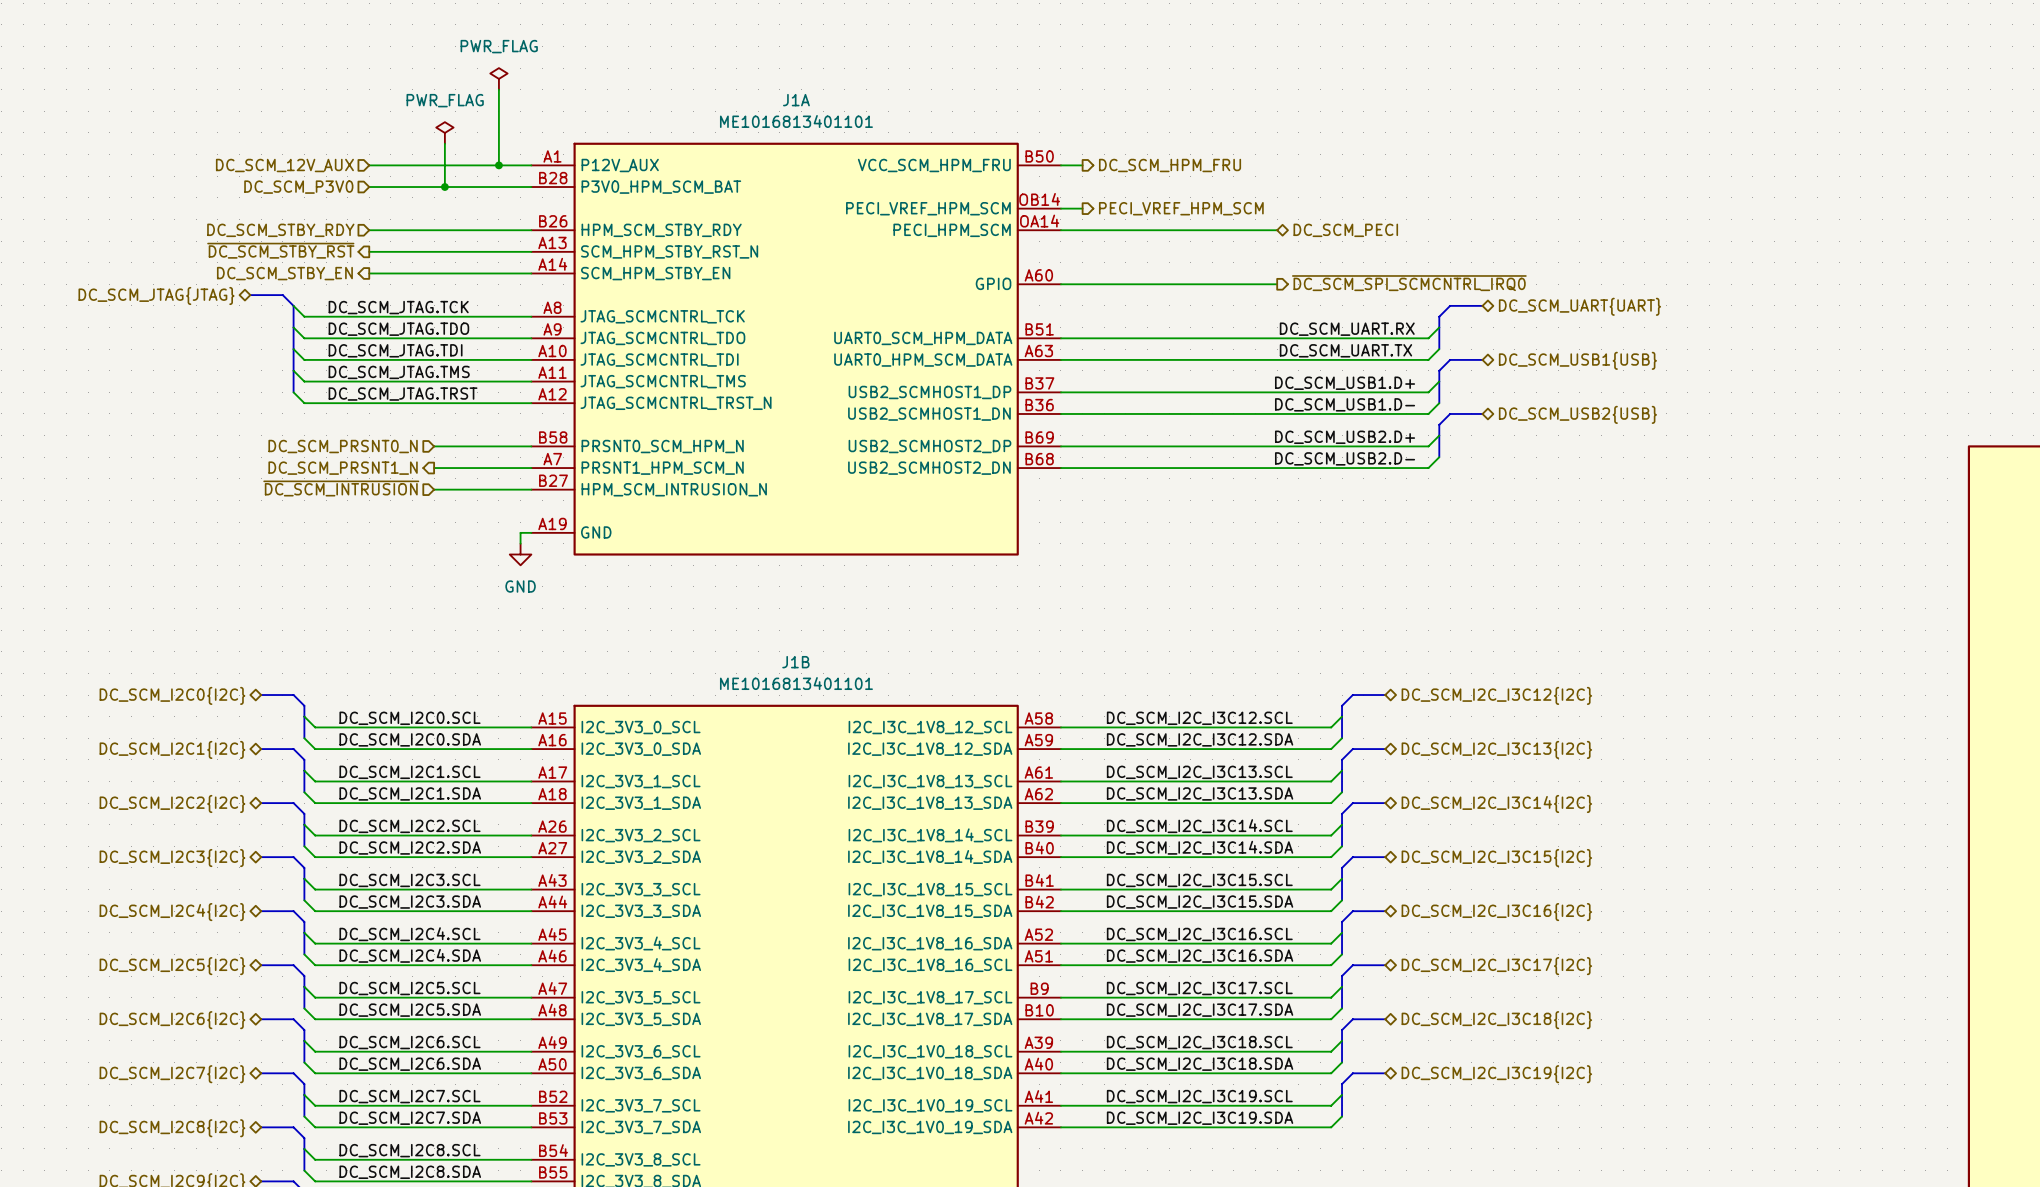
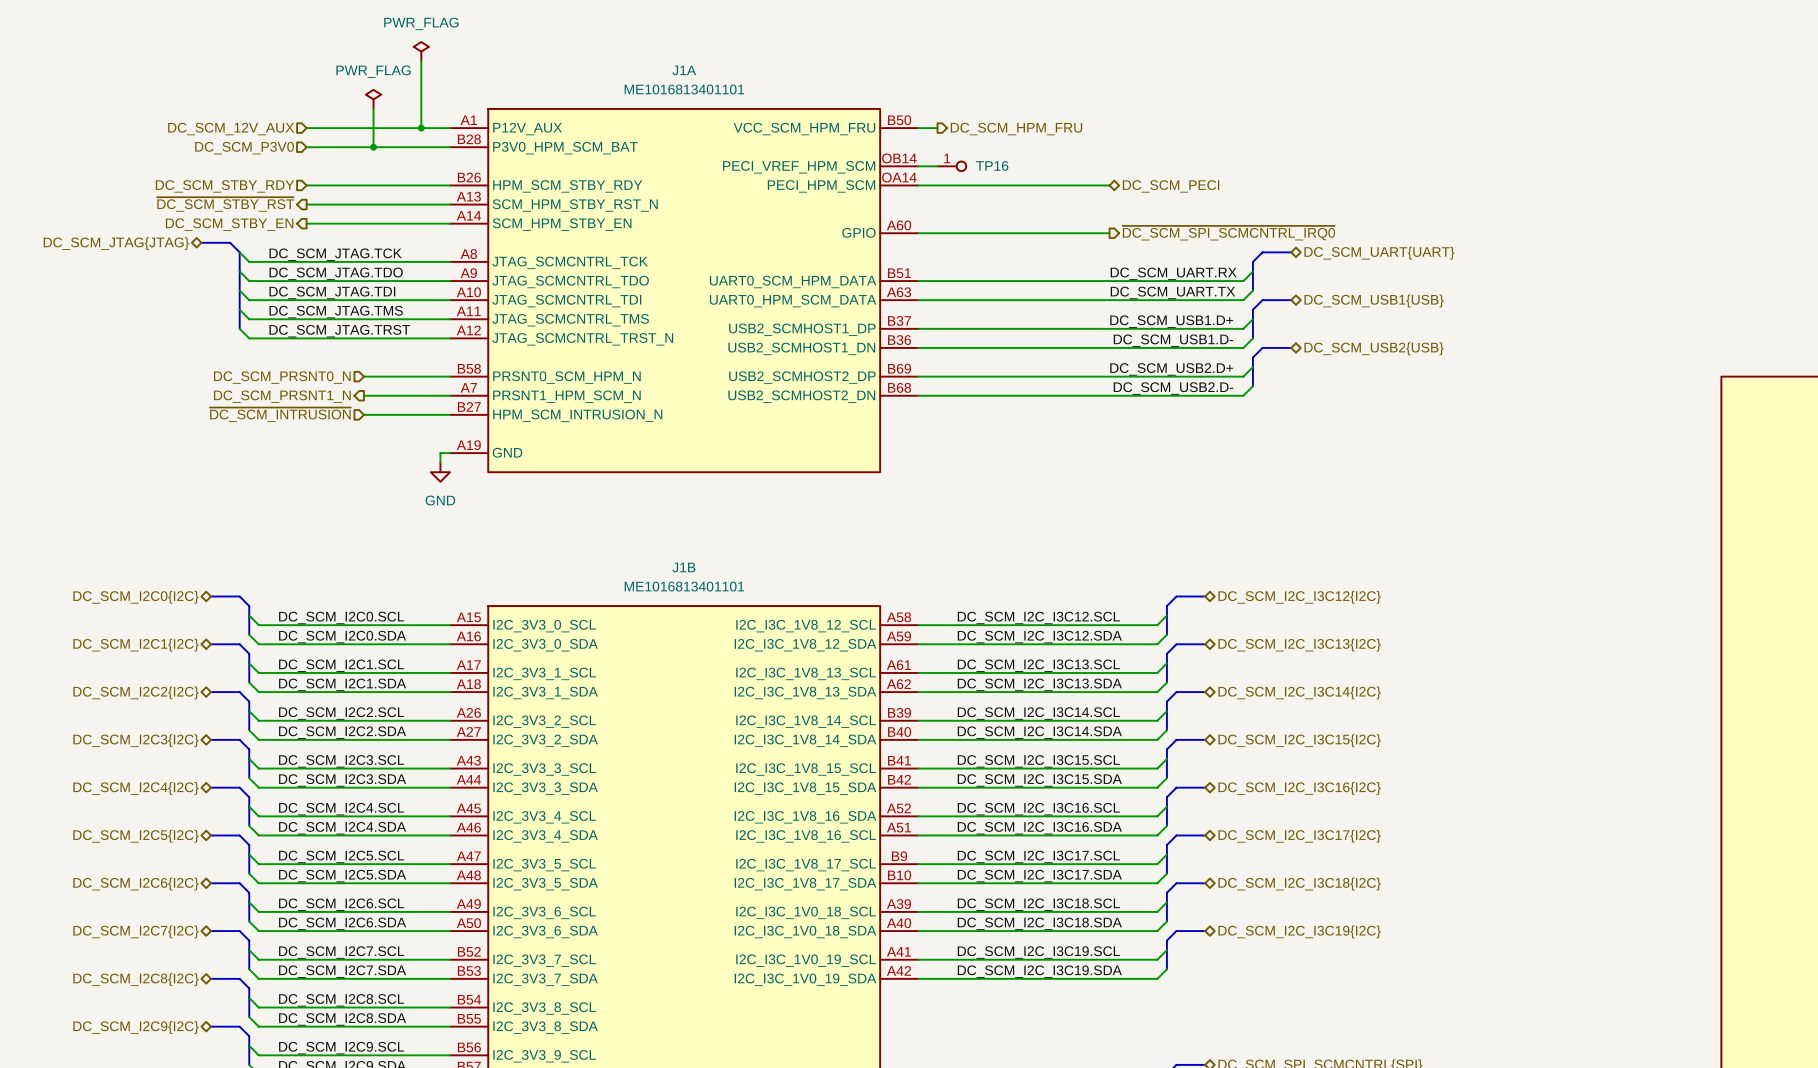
TP16: none -> (952, 166)
hierarchical label: PECI_VREF_HPM_SCM (1181, 208) -> none

